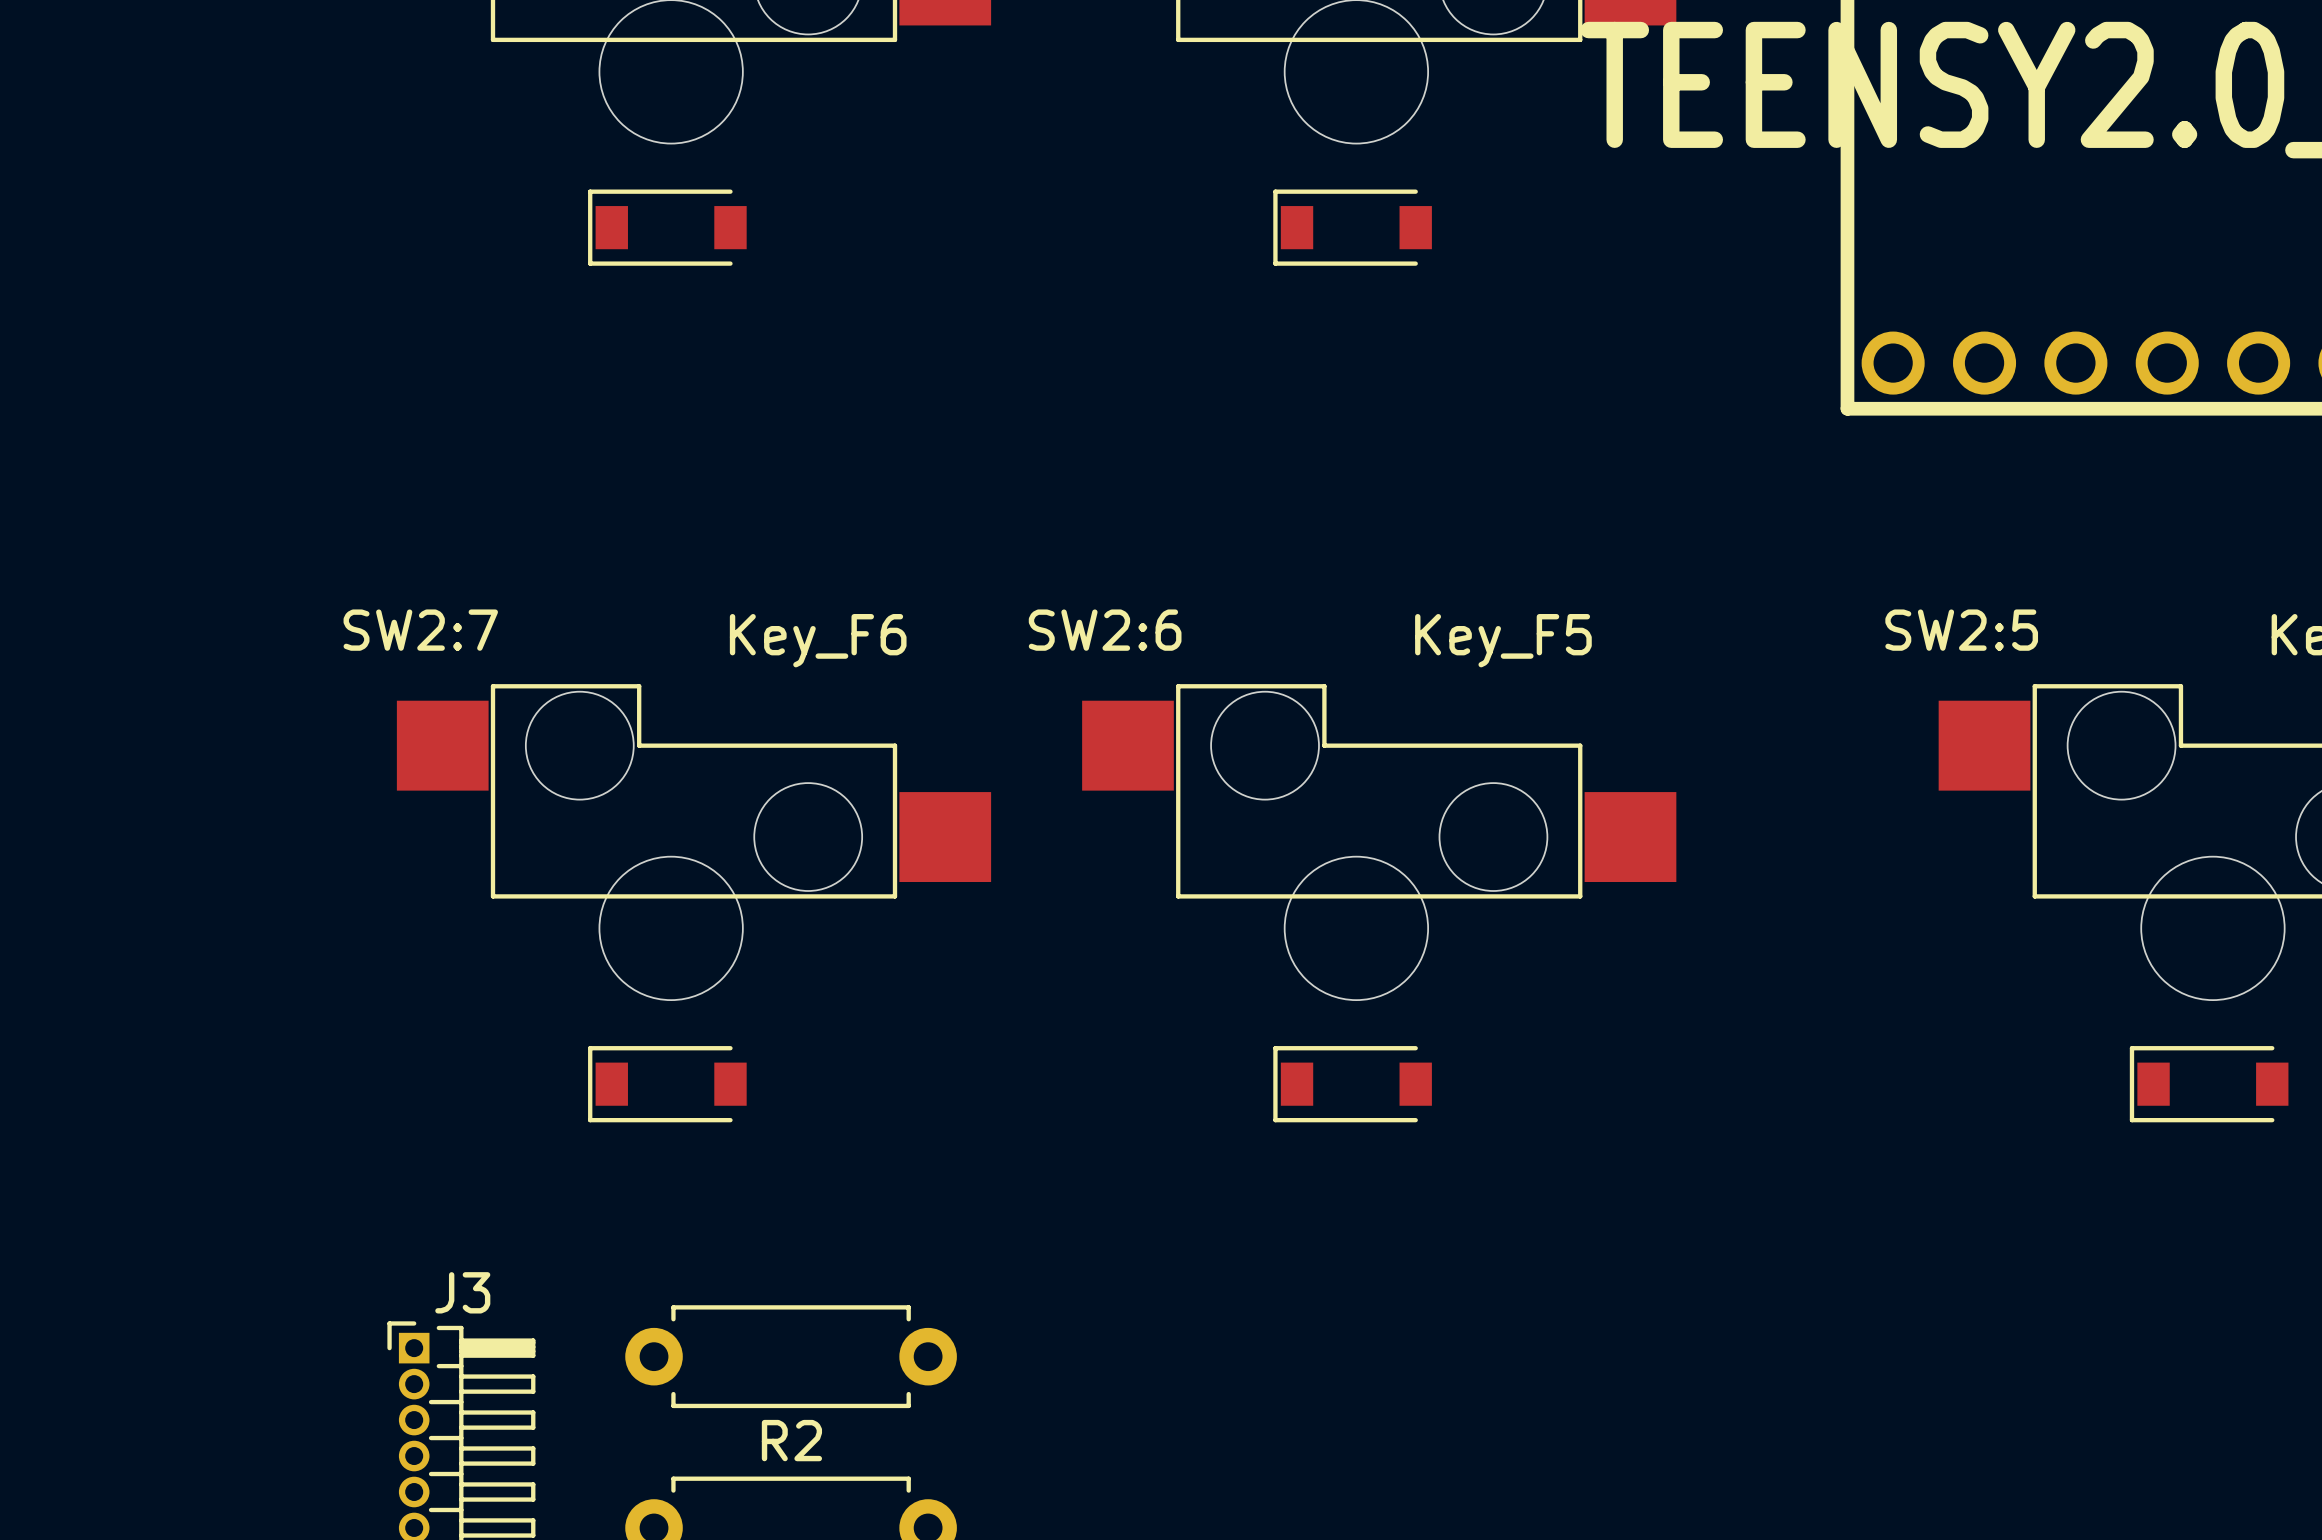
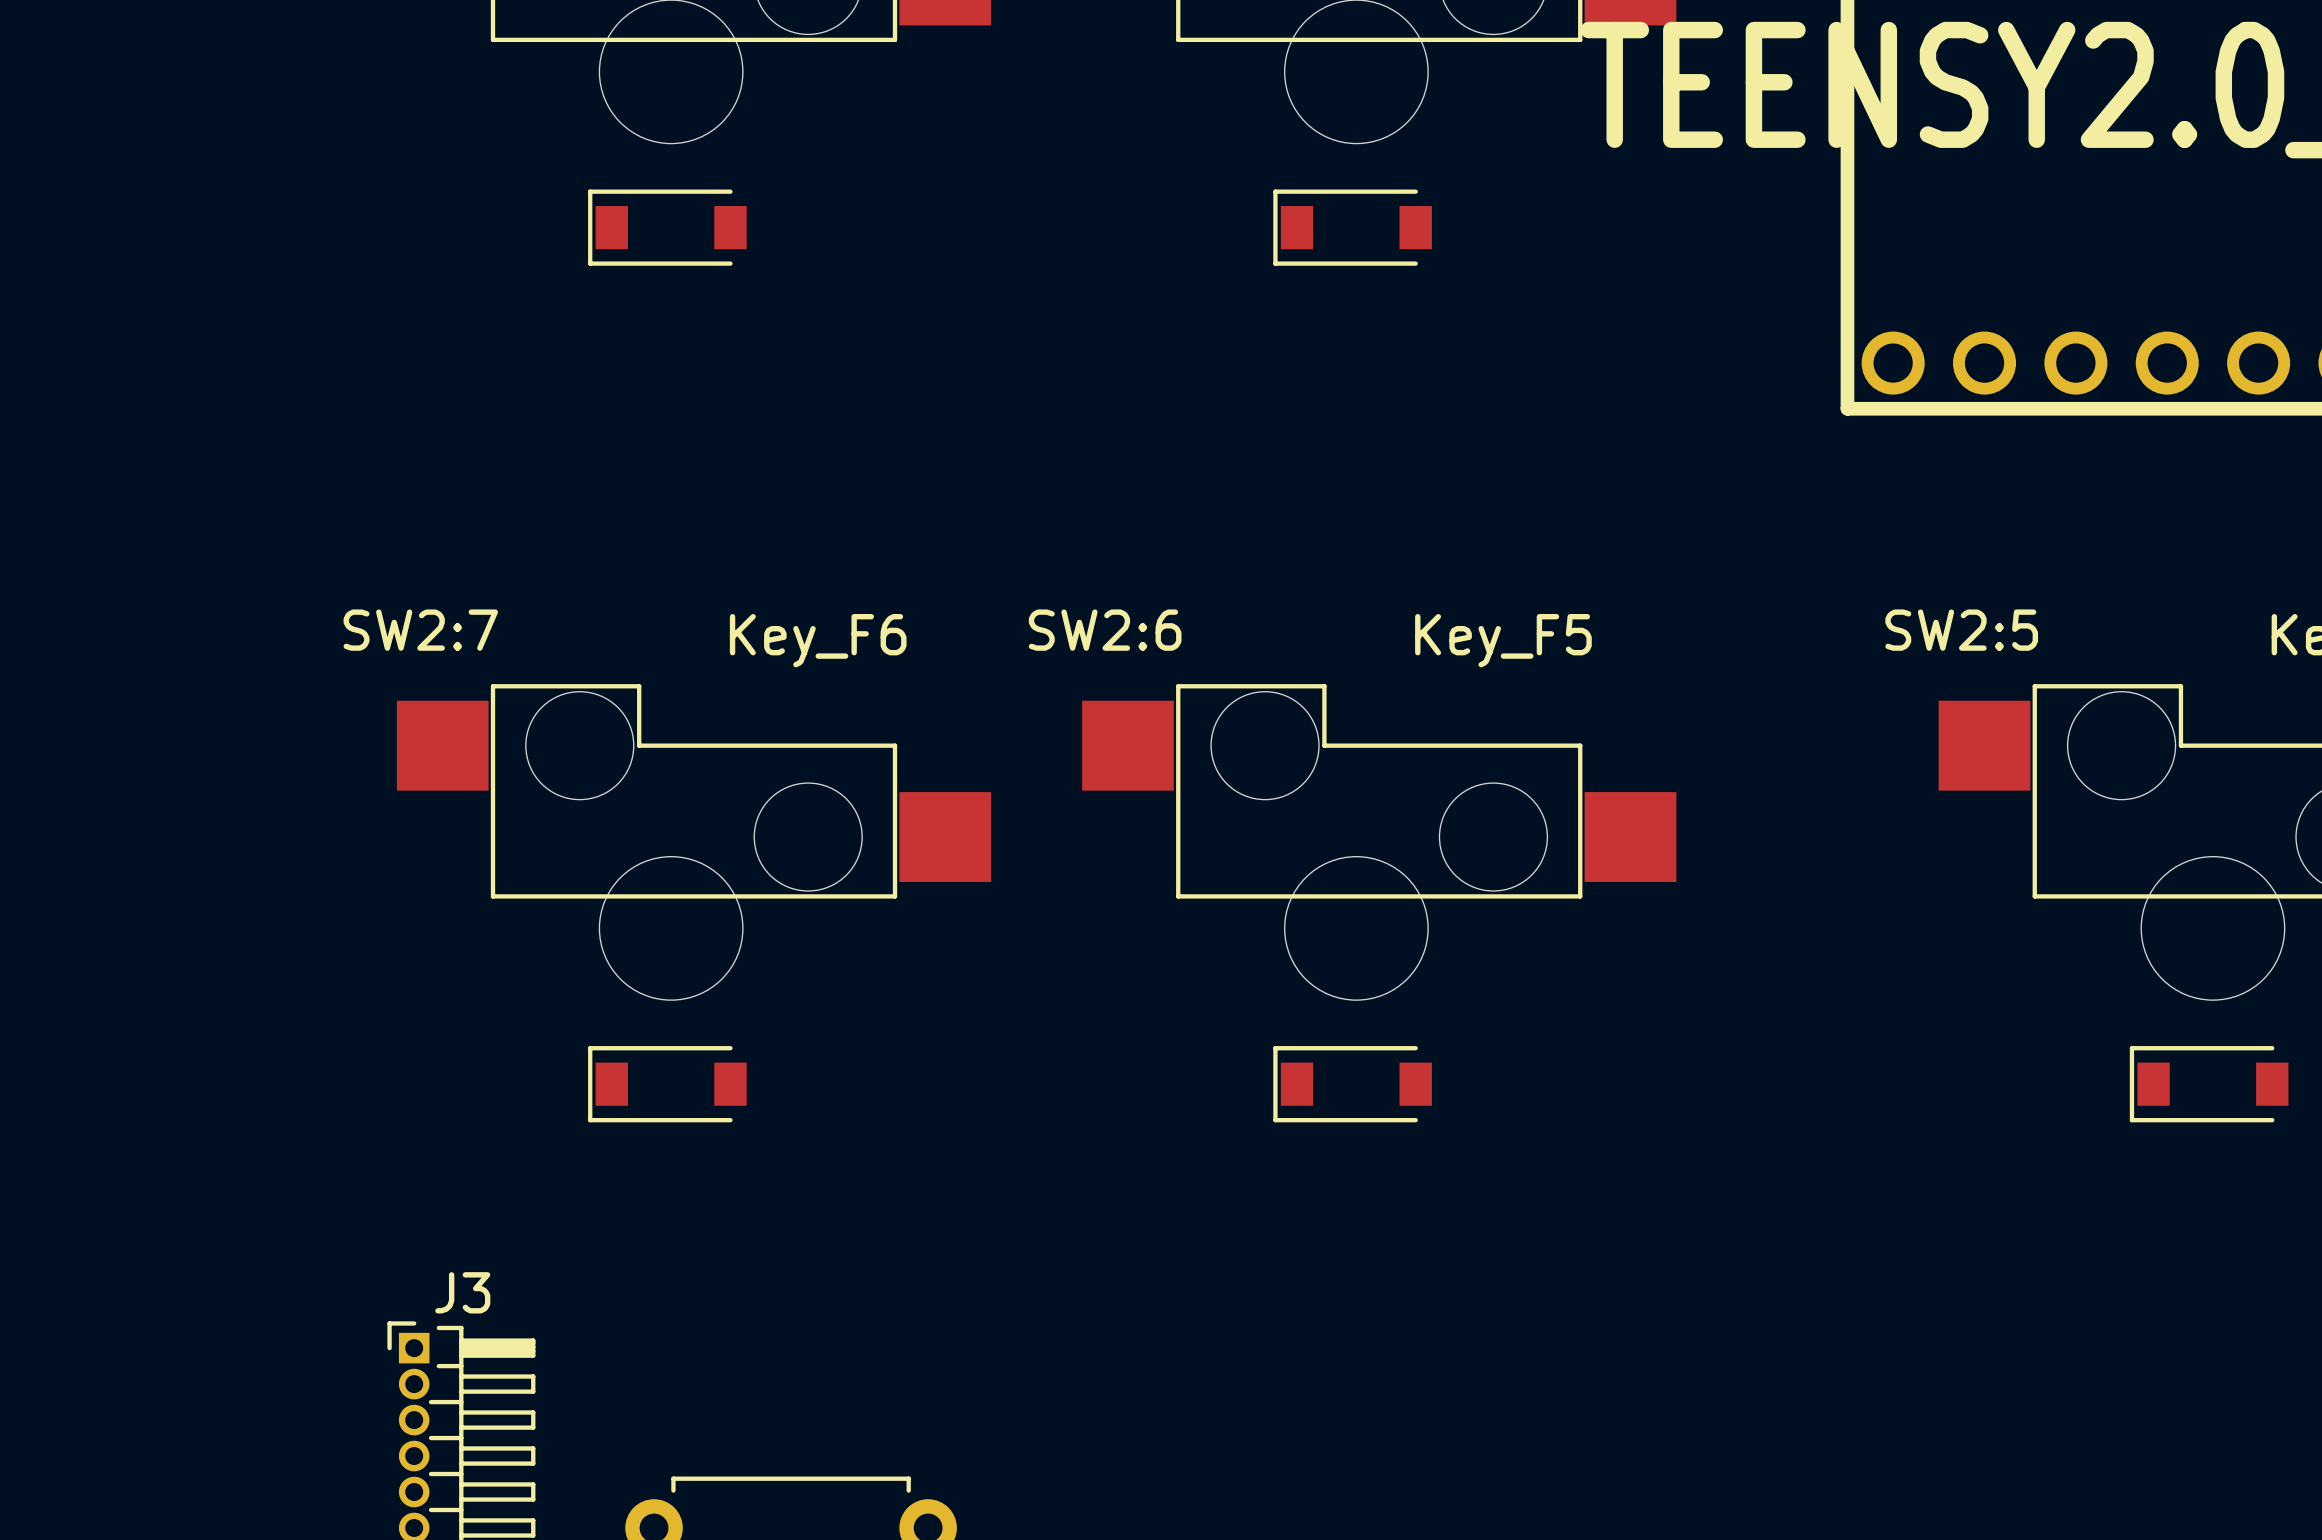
R2: (791, 1356) -> none

